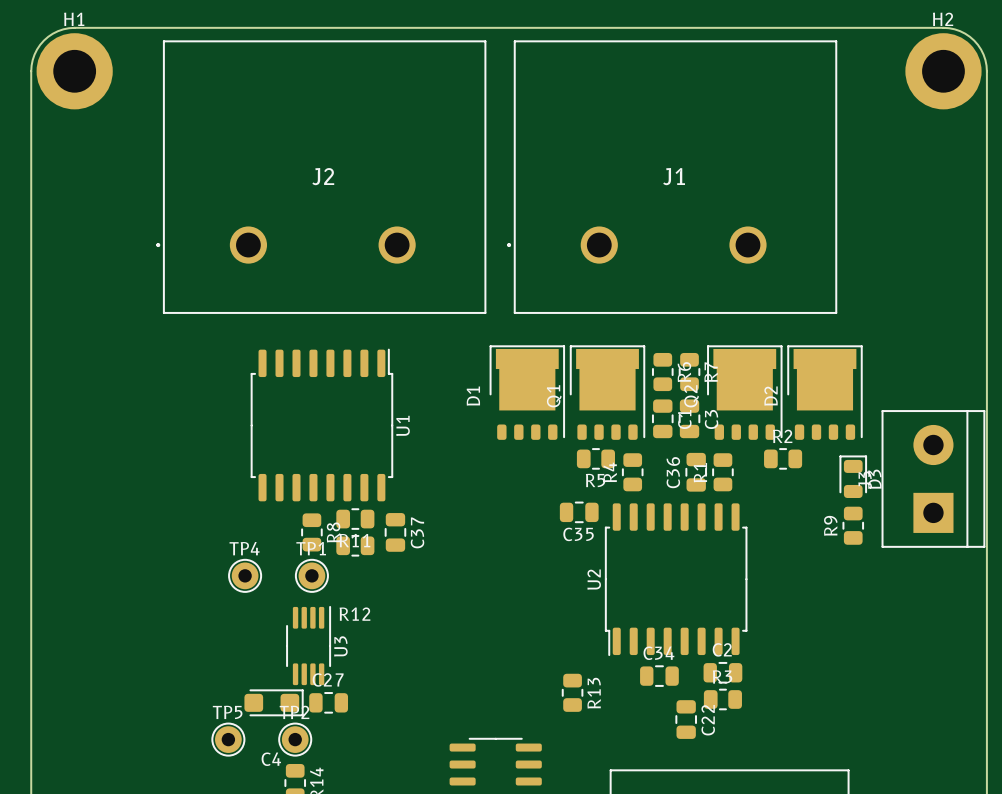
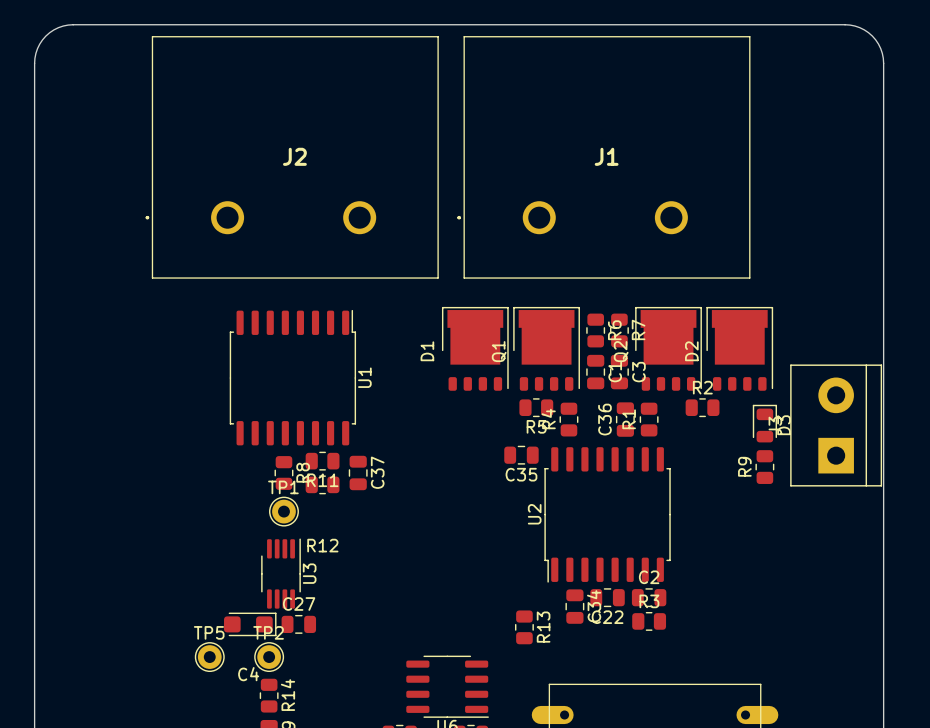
H1: (74, 71) -> none
H2: (943, 71) -> none
TP4: (245, 575) -> none
C34 rotation: 0° (659, 676) -> 90° clockwise (574, 606)
R13 position: (572, 692) -> (524, 627)
C22 rotation: 0° (686, 719) -> 90° clockwise (607, 597)
C22 position: (686, 719) -> (607, 597)

